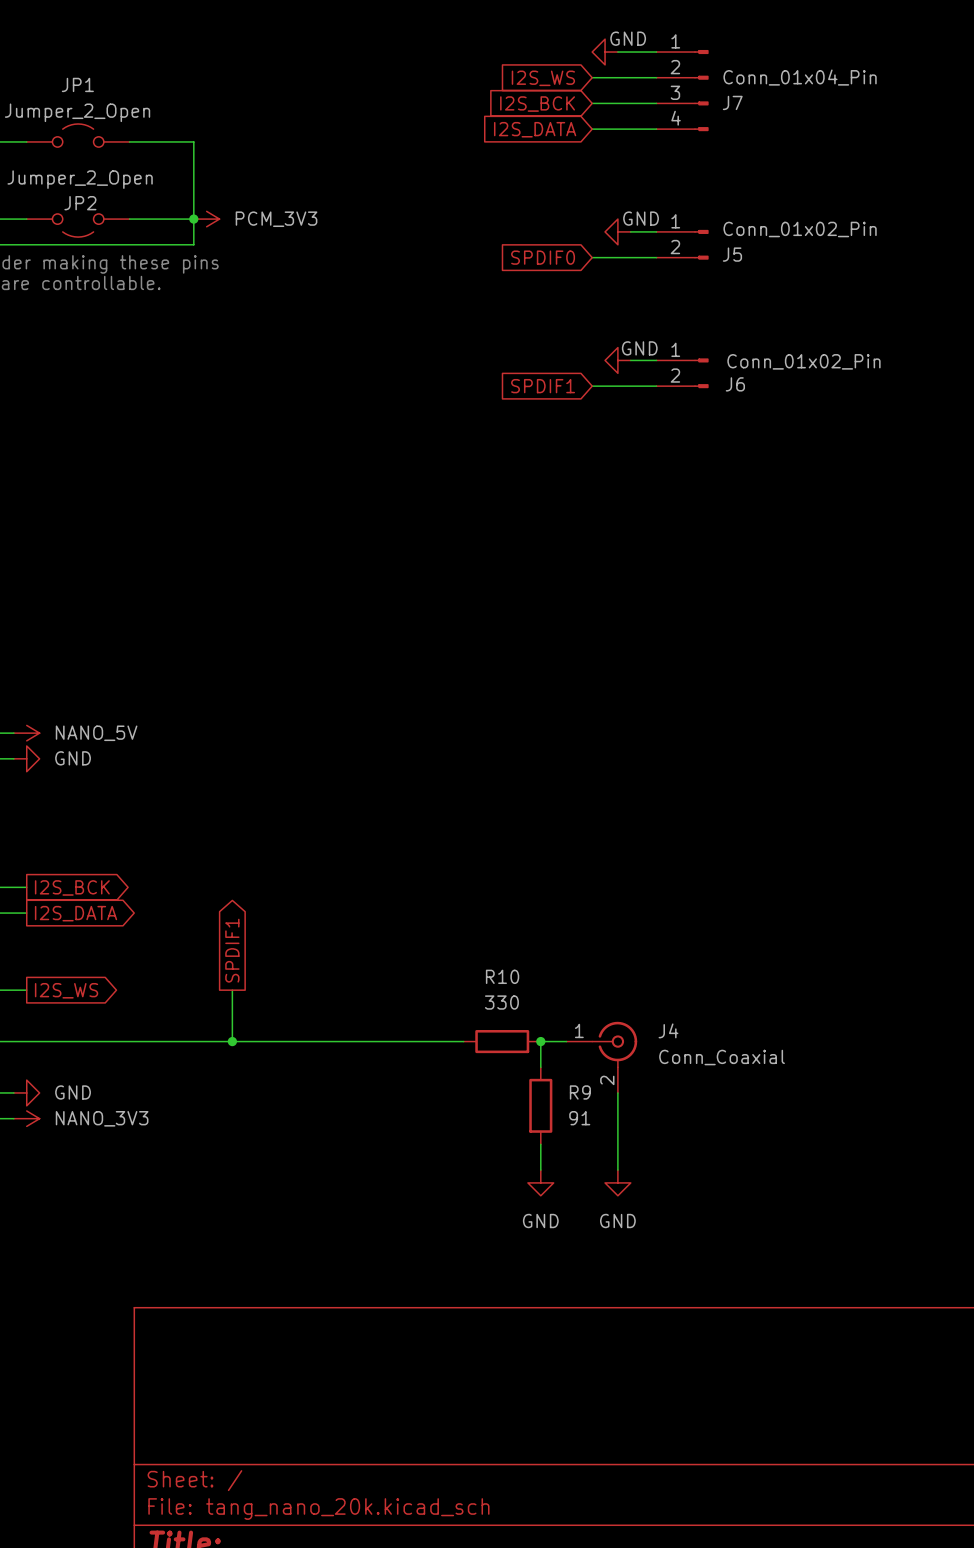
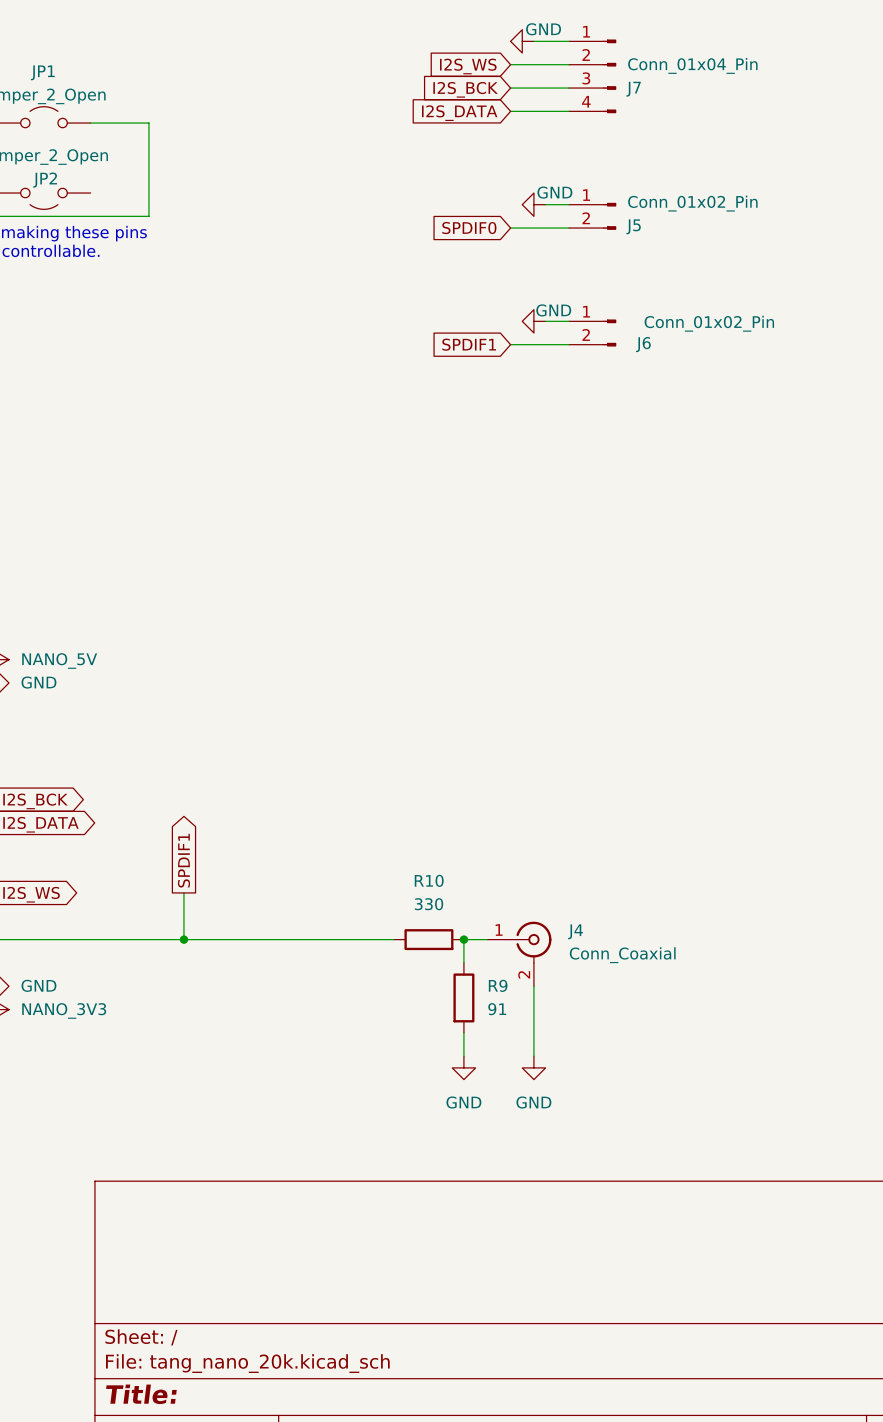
wire: (129, 219) (193, 219) -> none
junction: (193, 219) -> none
power symbol: PCM_3V3 (206, 219) -> none

